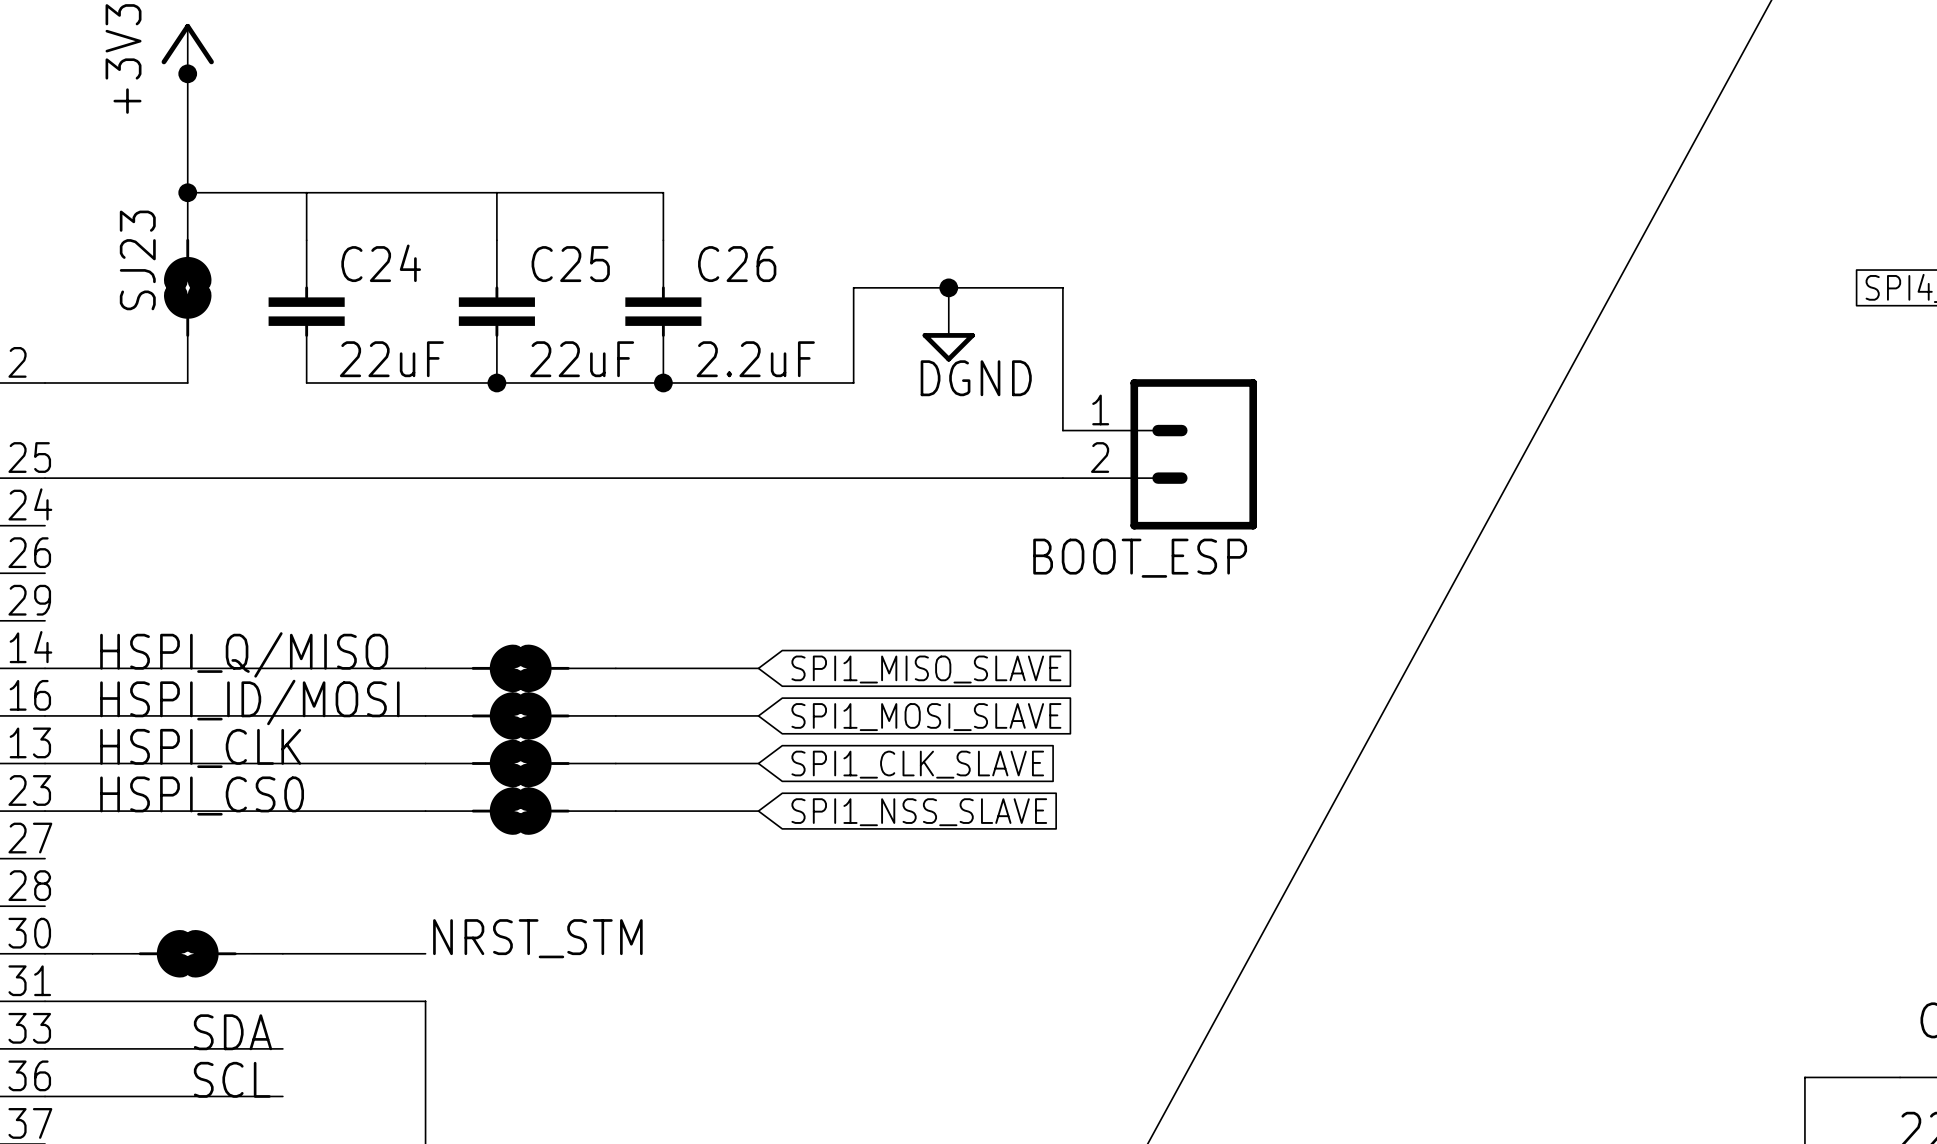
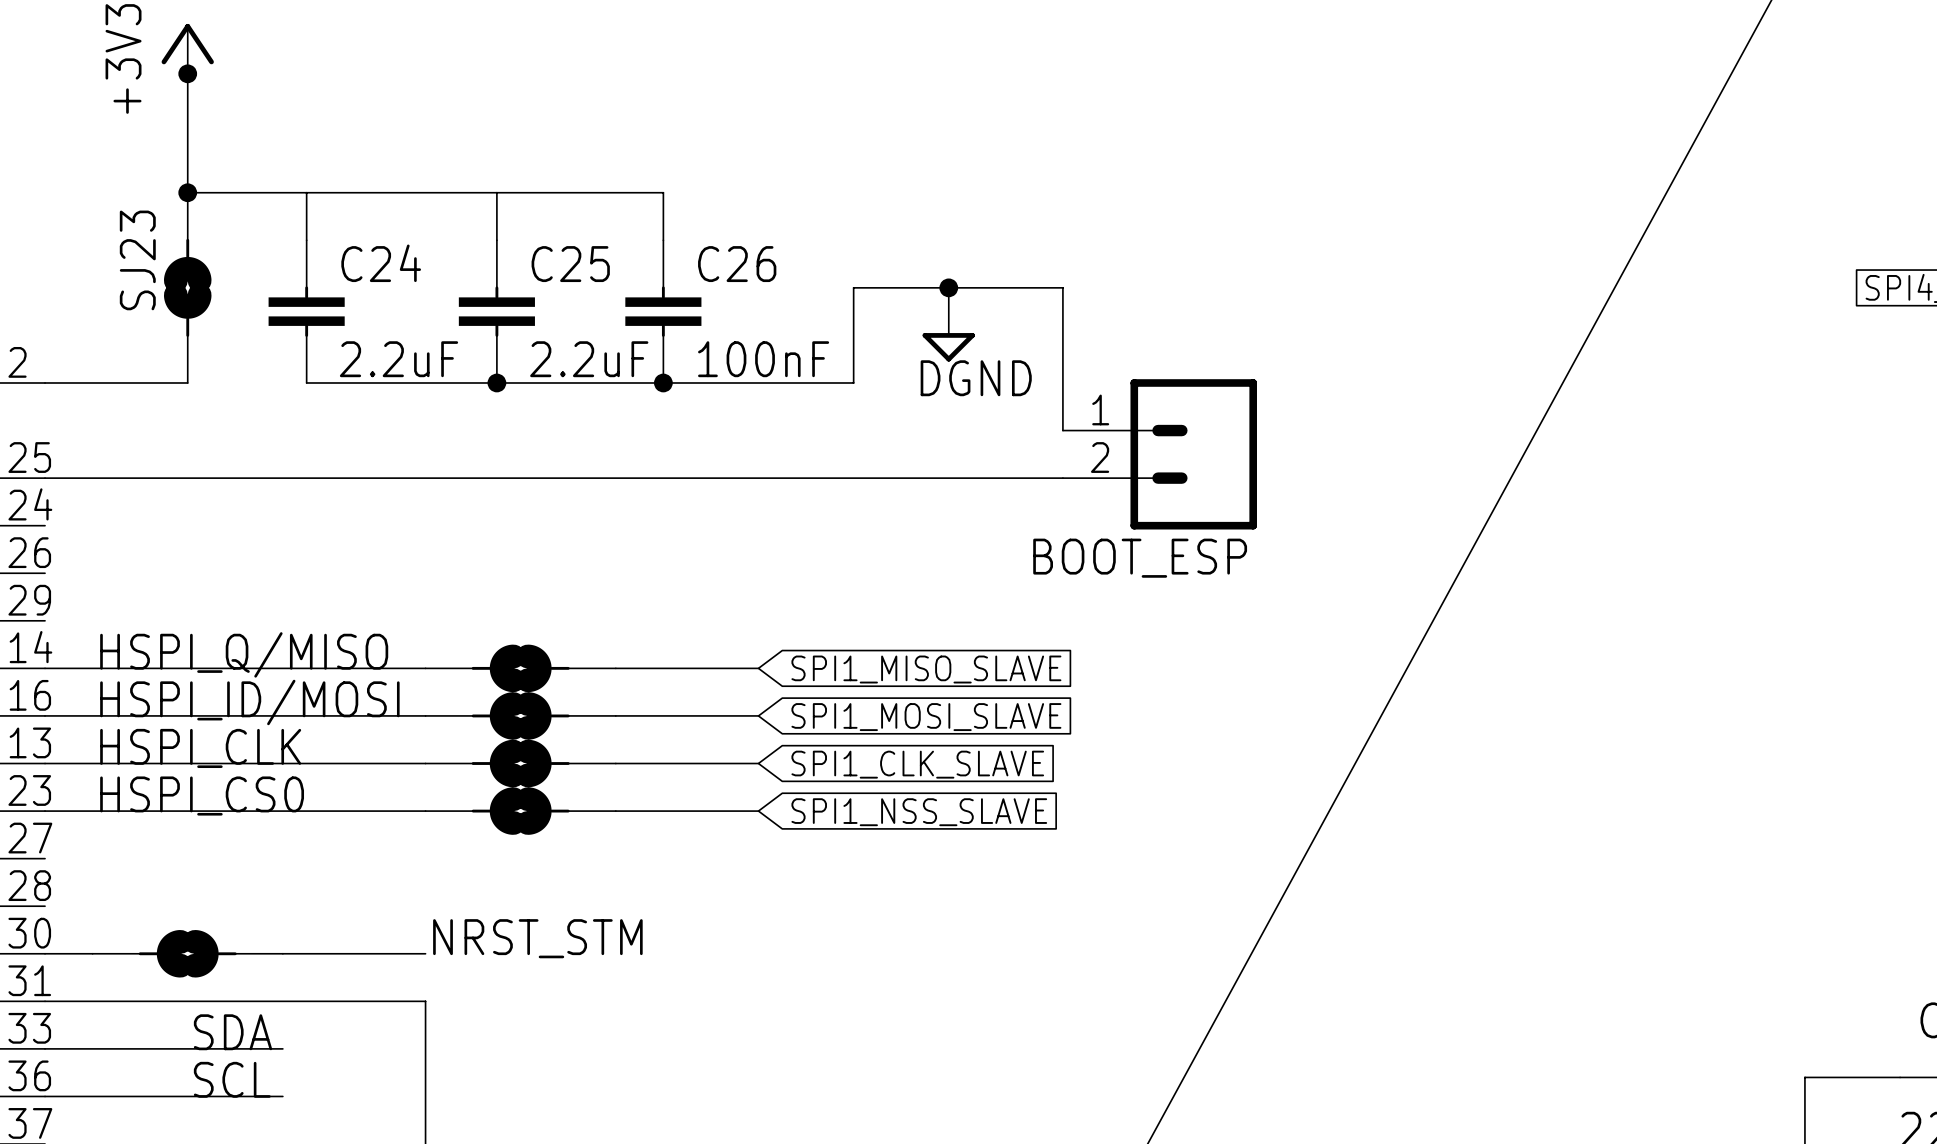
C24 value: 22uF (391, 359) -> 2.2uF (399, 359)
C25 value: 22uF (582, 359) -> 2.2uF (589, 359)
C26 value: 2.2uF (755, 359) -> 100nF (763, 359)

